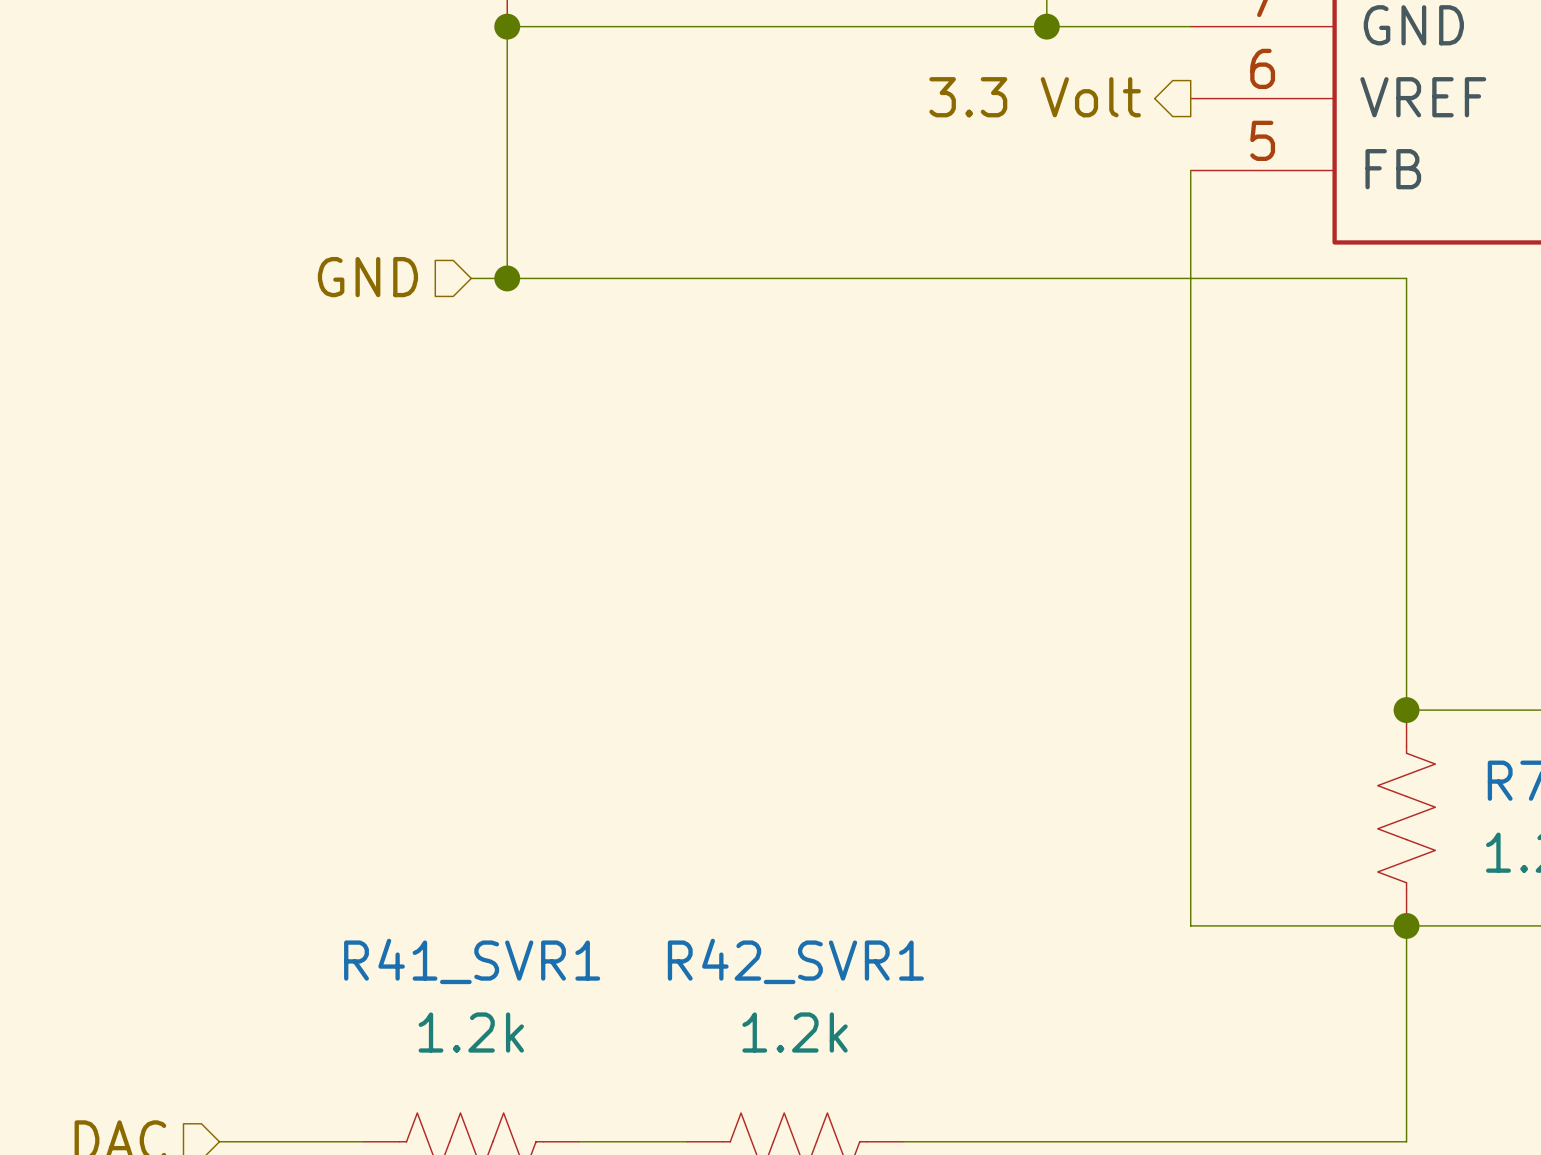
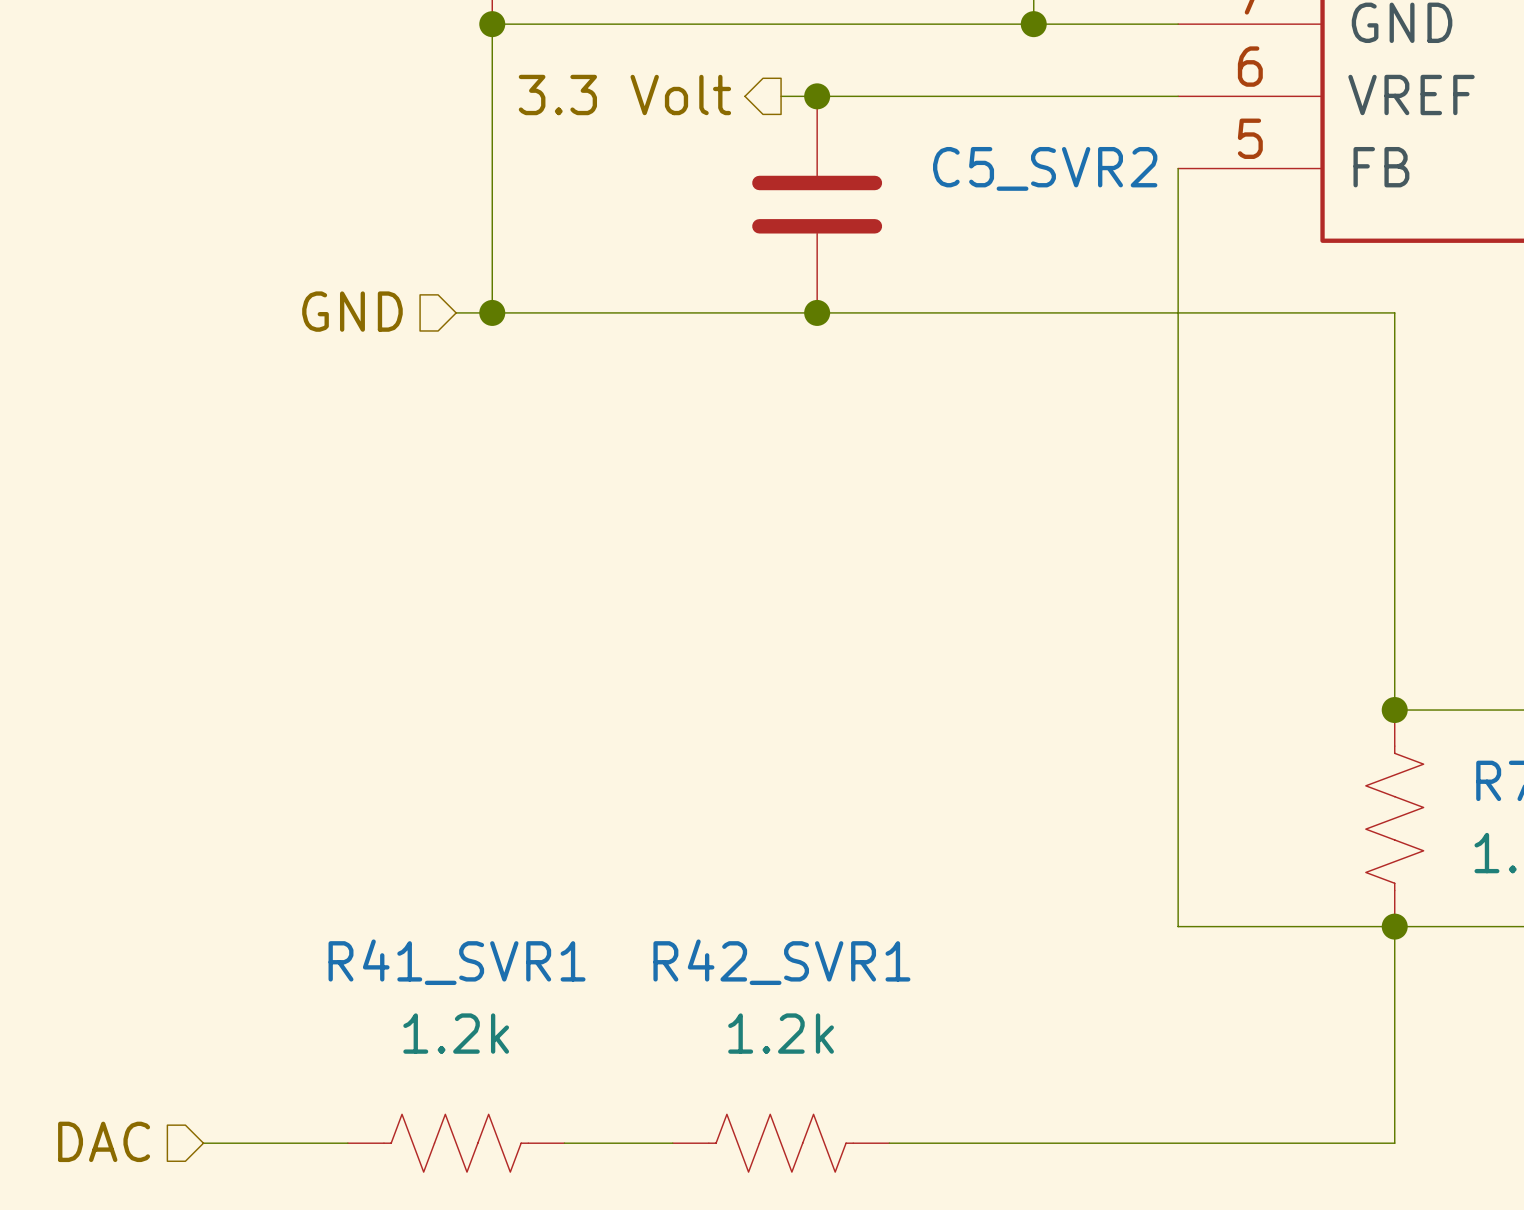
hierarchical label position: 3.3 Volt (1035, 97) -> 3.3 Volt (624, 94)
wire: none -> (781, 96) (1178, 96)
junction: none -> (817, 96)
C5_SVR2: none -> (817, 204)
hierarchical label position: GND (367, 277) -> GND (352, 311)
wire: (471, 278) (1406, 278) (1406, 314) -> (456, 312) (1394, 312)
wire: none -> (492, 276) (492, 312)
junction position: (507, 278) -> (492, 312)
junction: none -> (817, 312)

